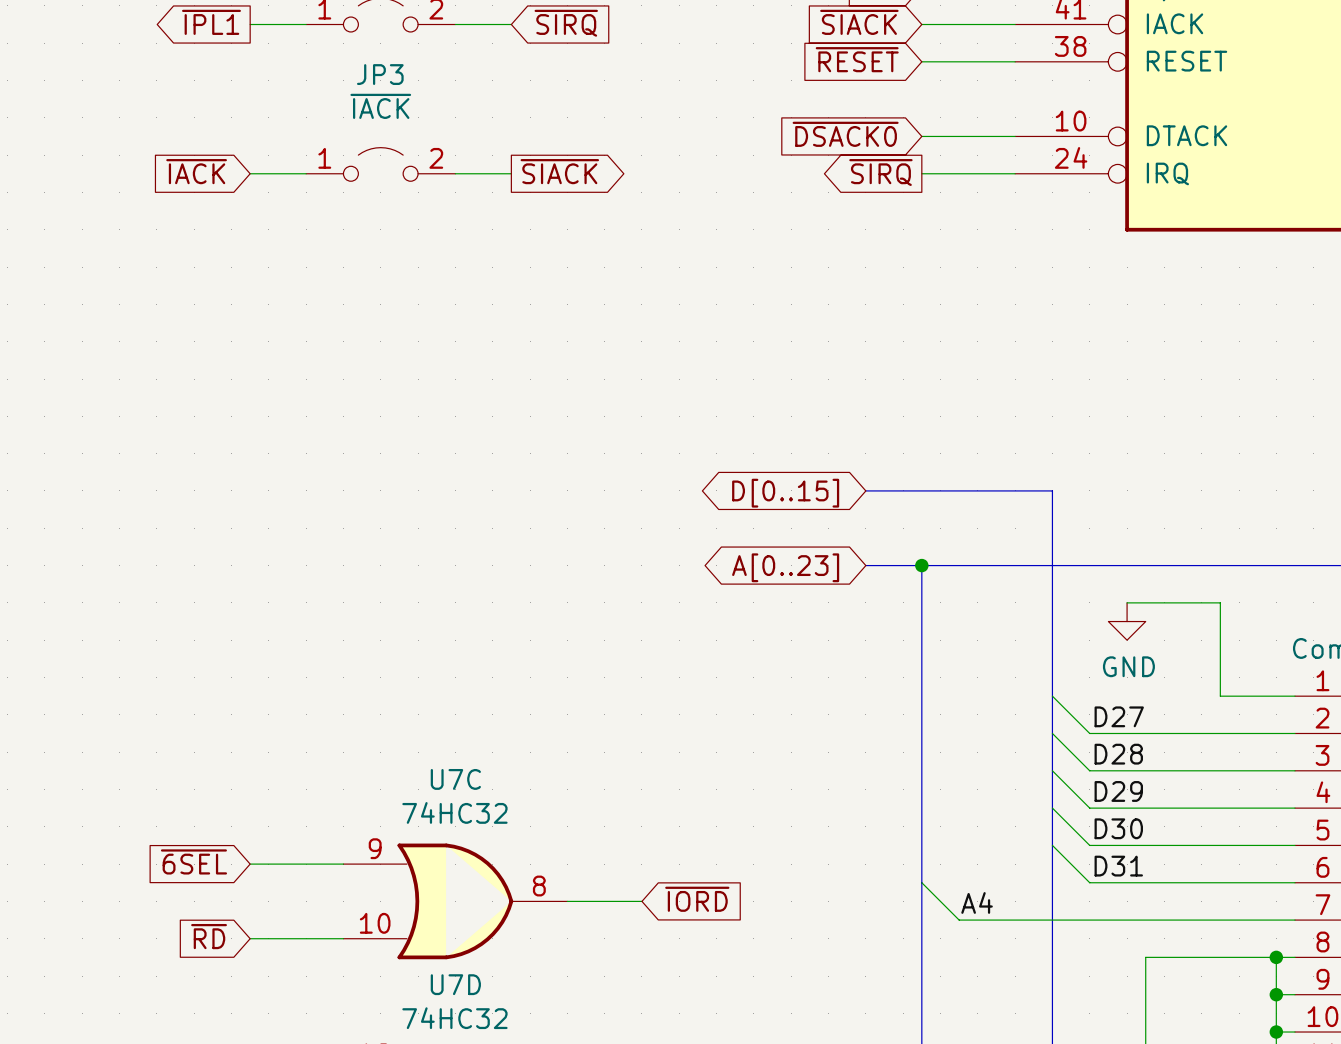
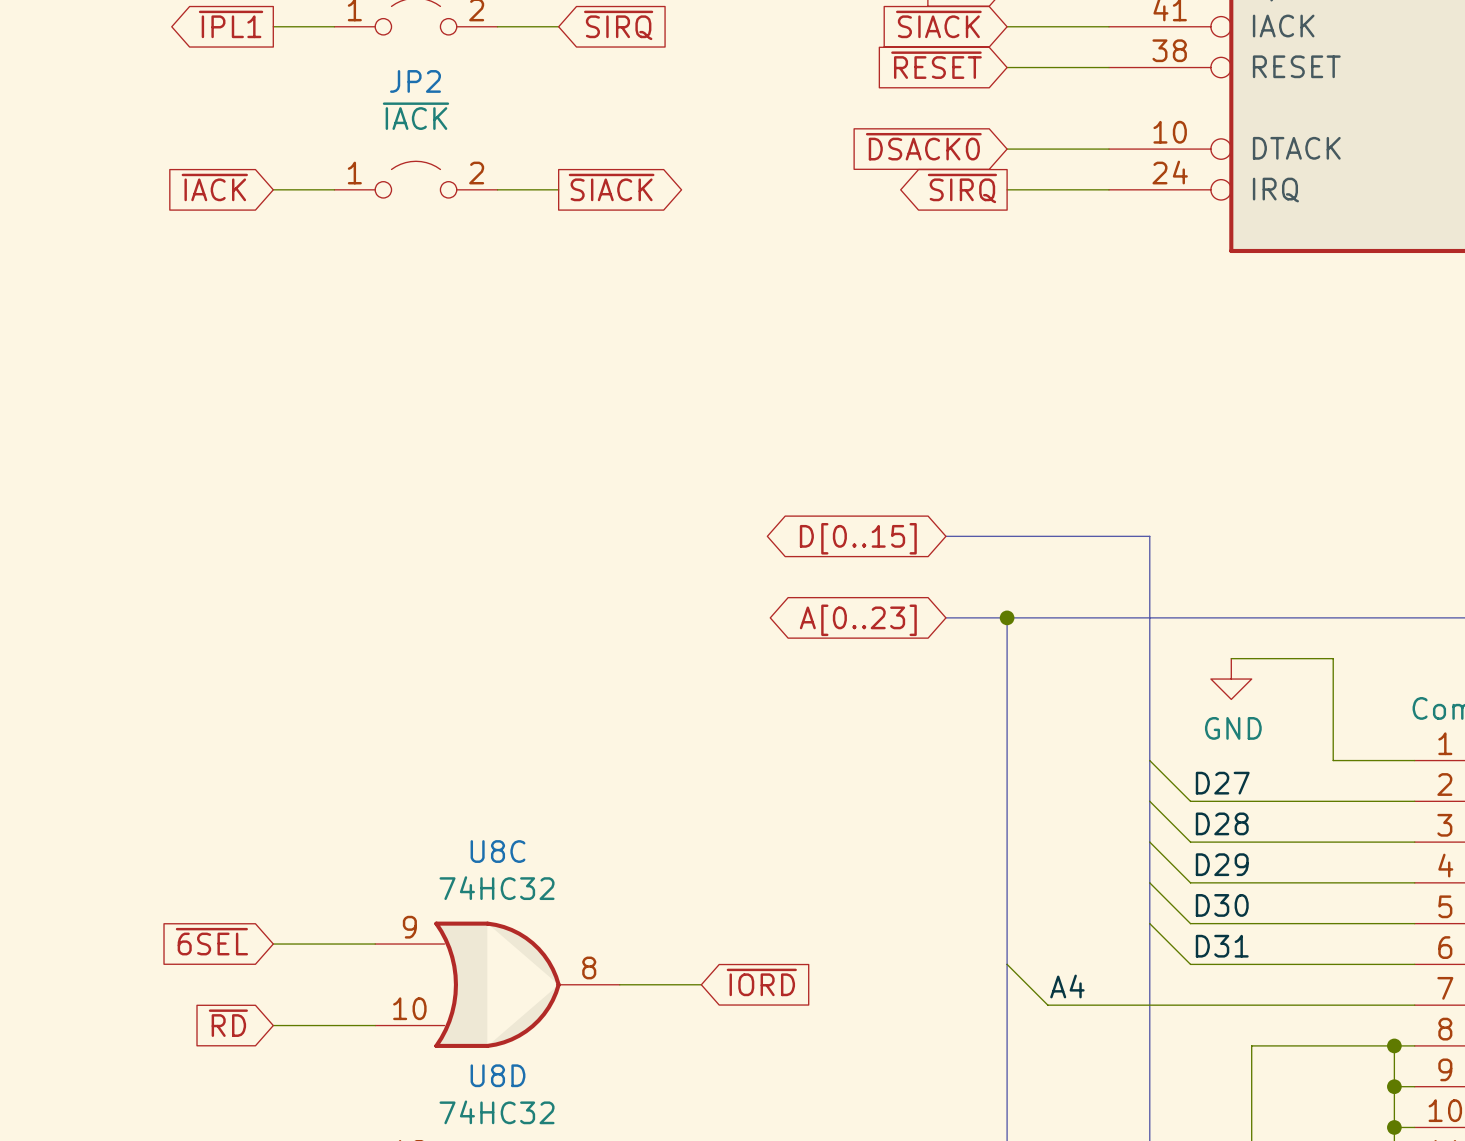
JP3 name: JP3 (380, 74) -> JP2 (415, 81)
U7C name: U7C (455, 779) -> U8C (498, 851)
U7D name: U7D (455, 984) -> U8D (498, 1075)

